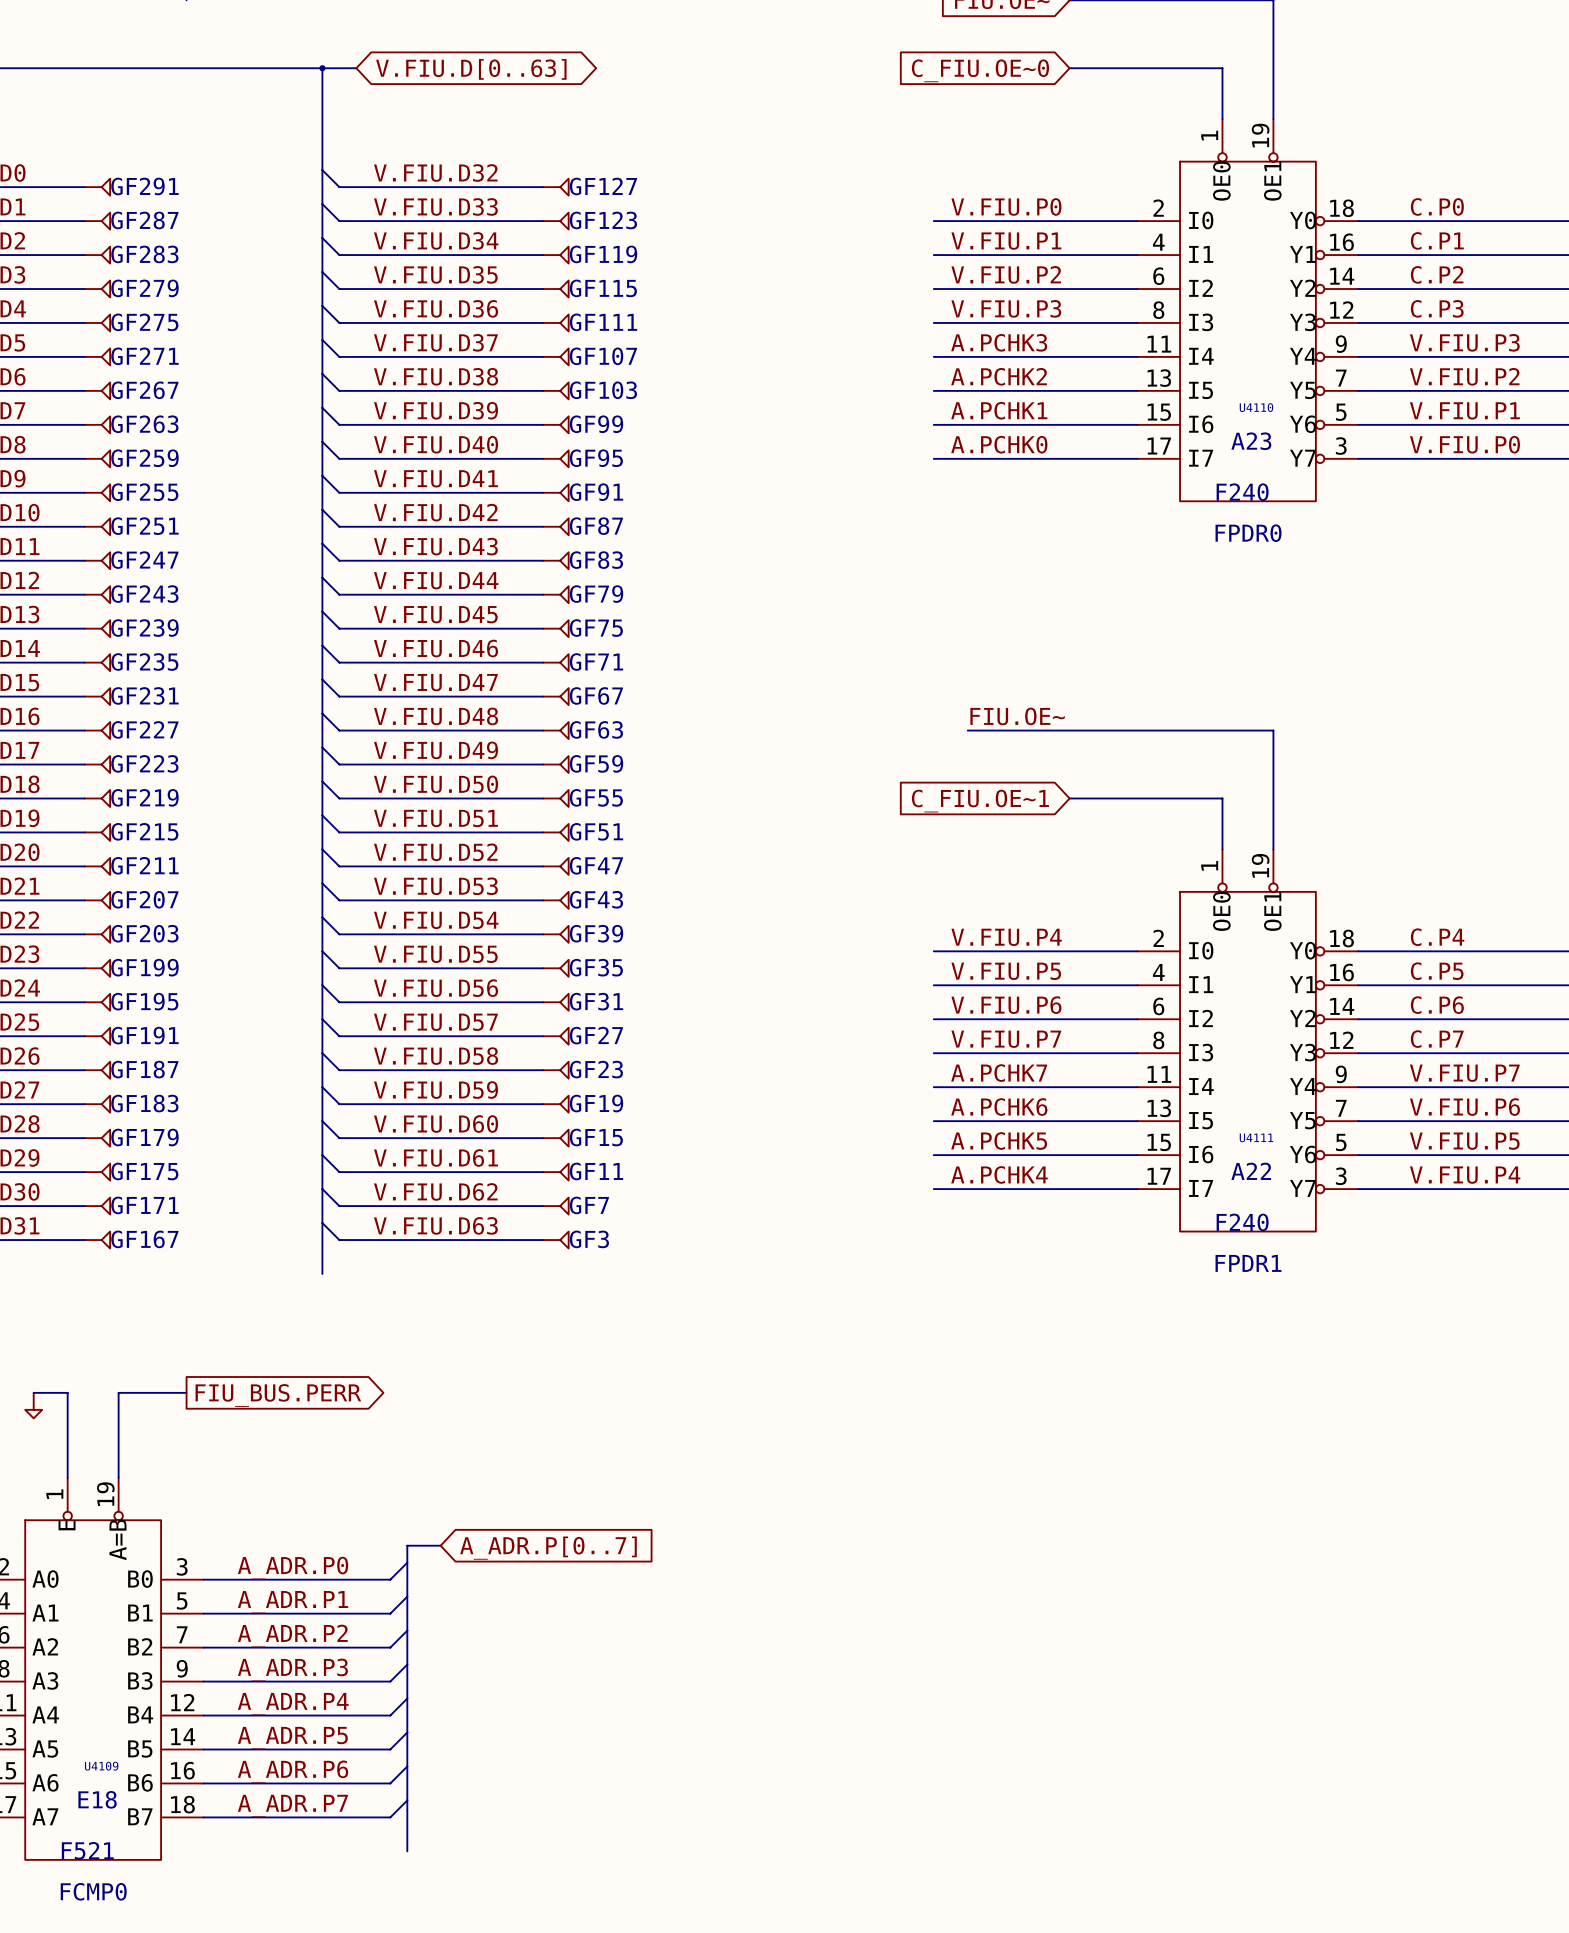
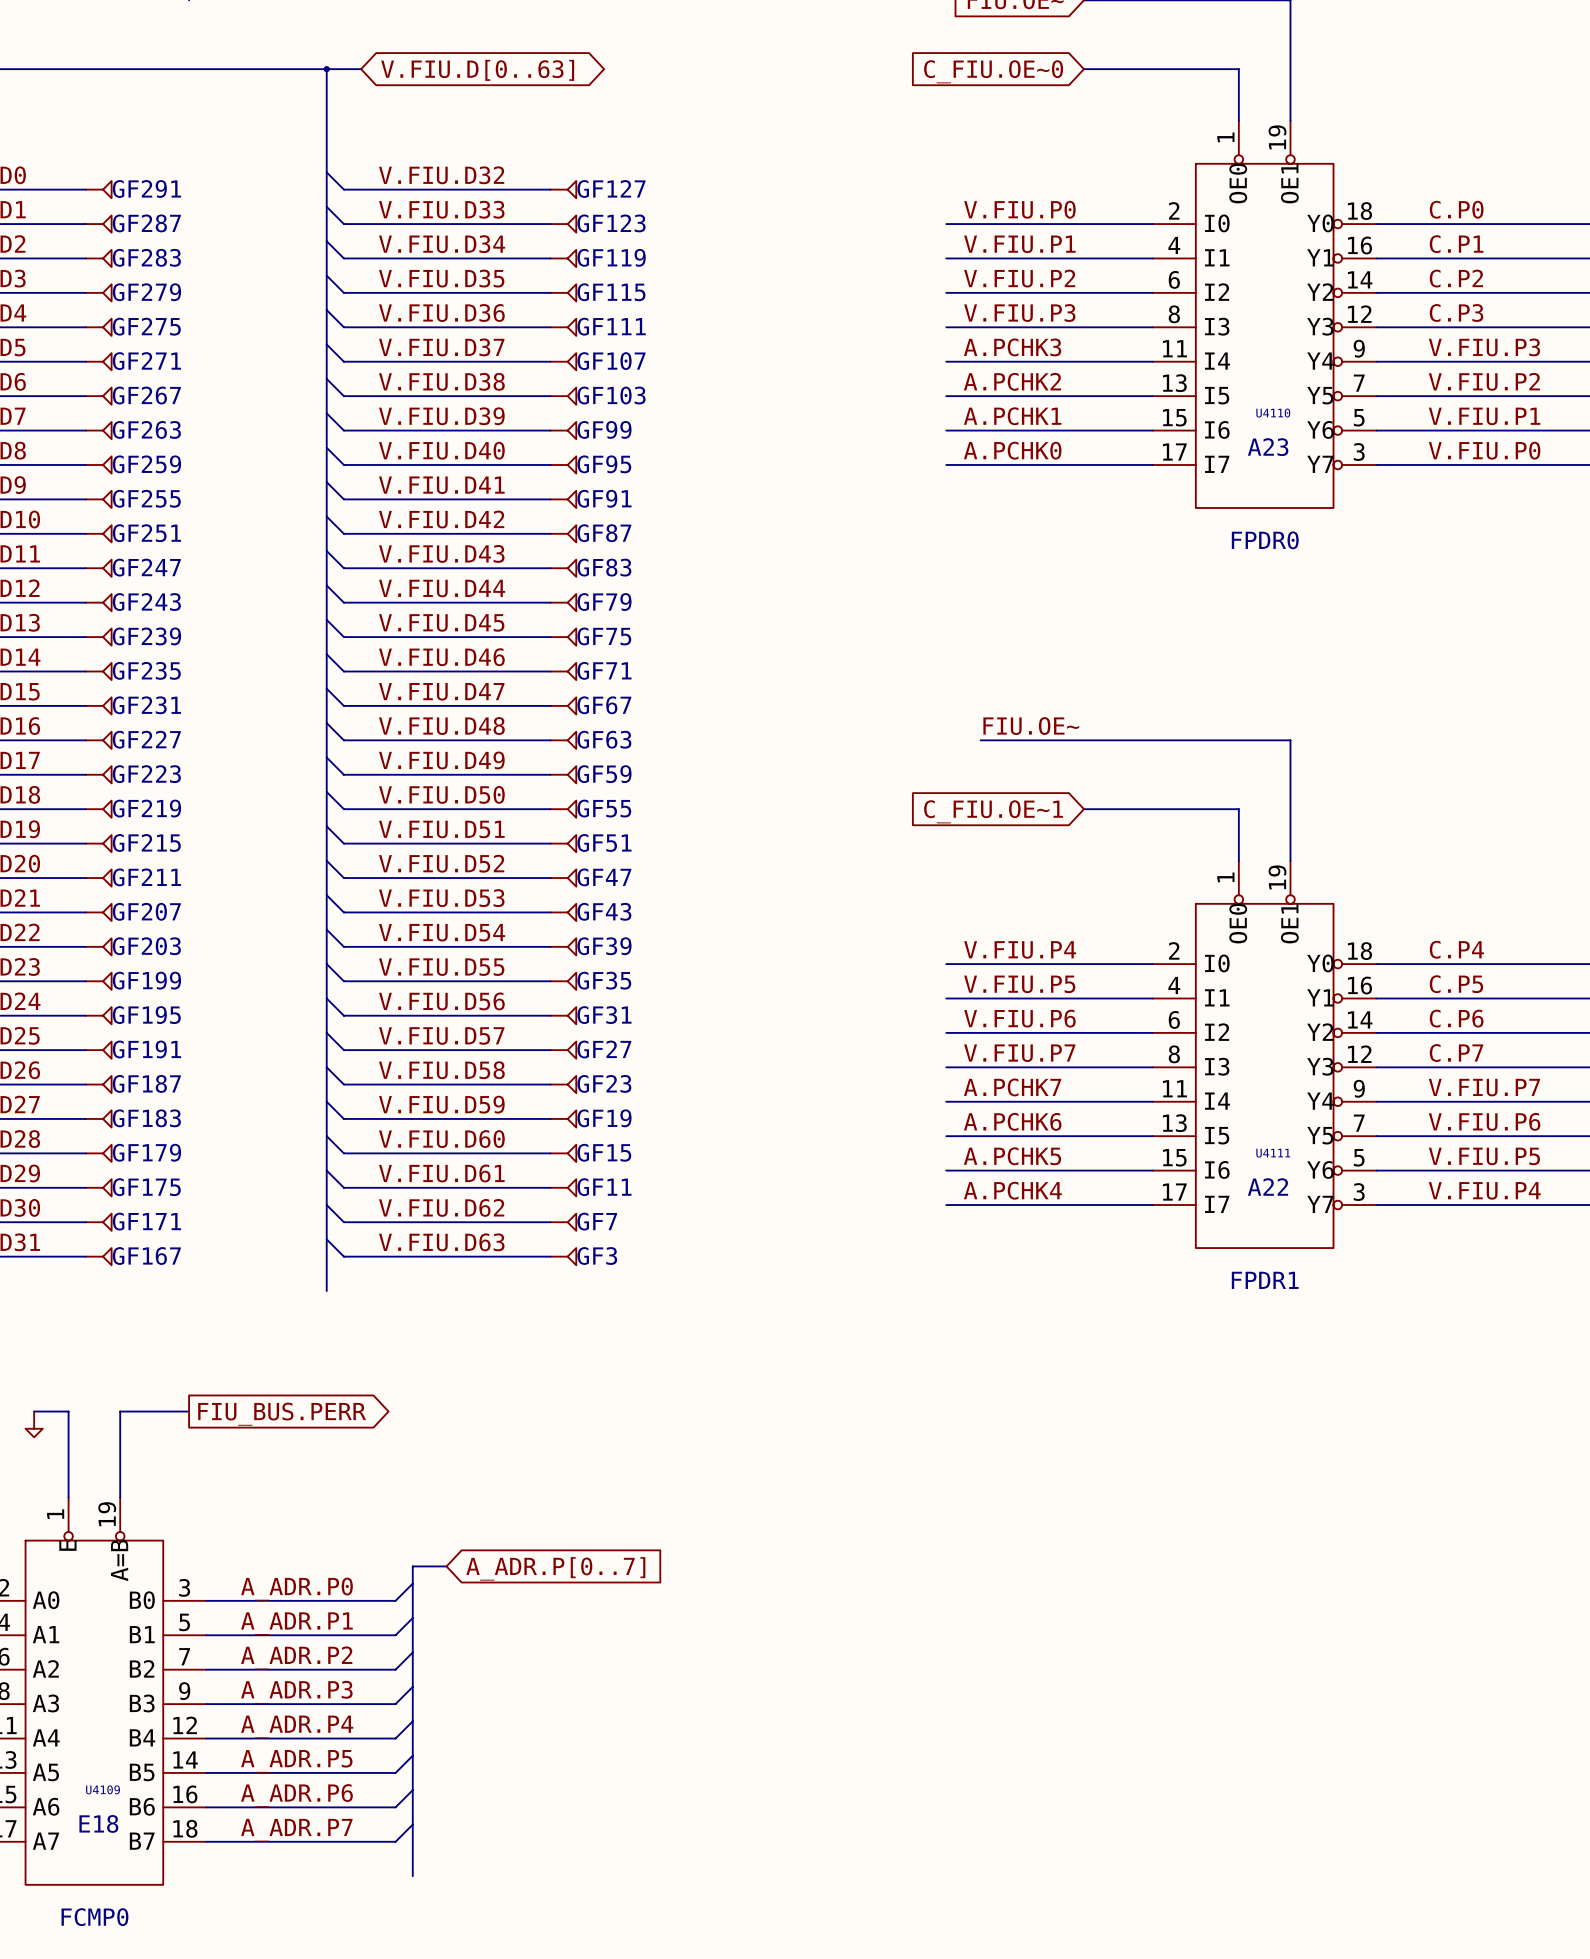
U4110 value: F240 (1242, 492) -> none
U4111 value: F240 (1242, 1222) -> none
U4109 value: F521 (87, 1850) -> none

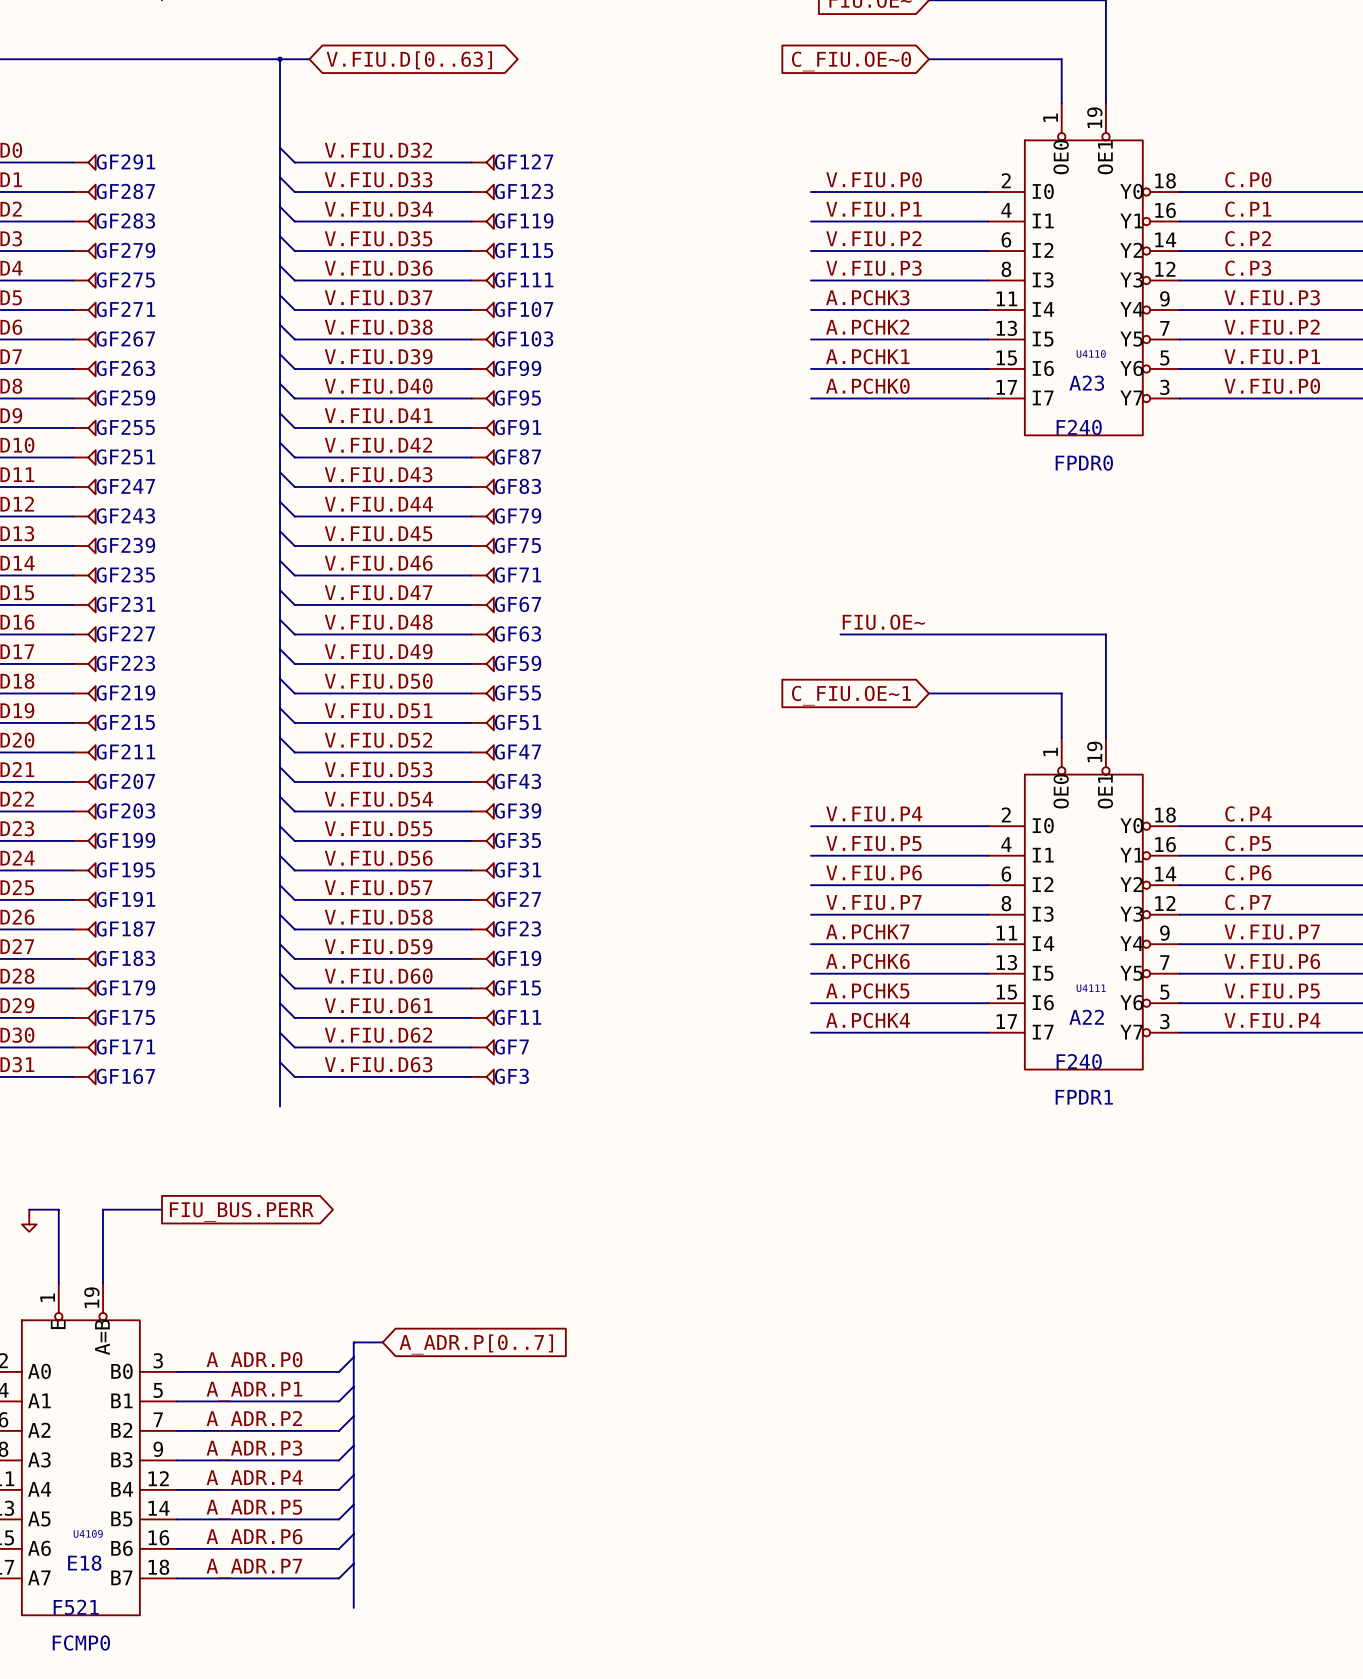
U4110 value: none -> F240 (1079, 427)
U4111 value: none -> F240 (1079, 1061)
U4109 value: none -> F521 (76, 1607)

